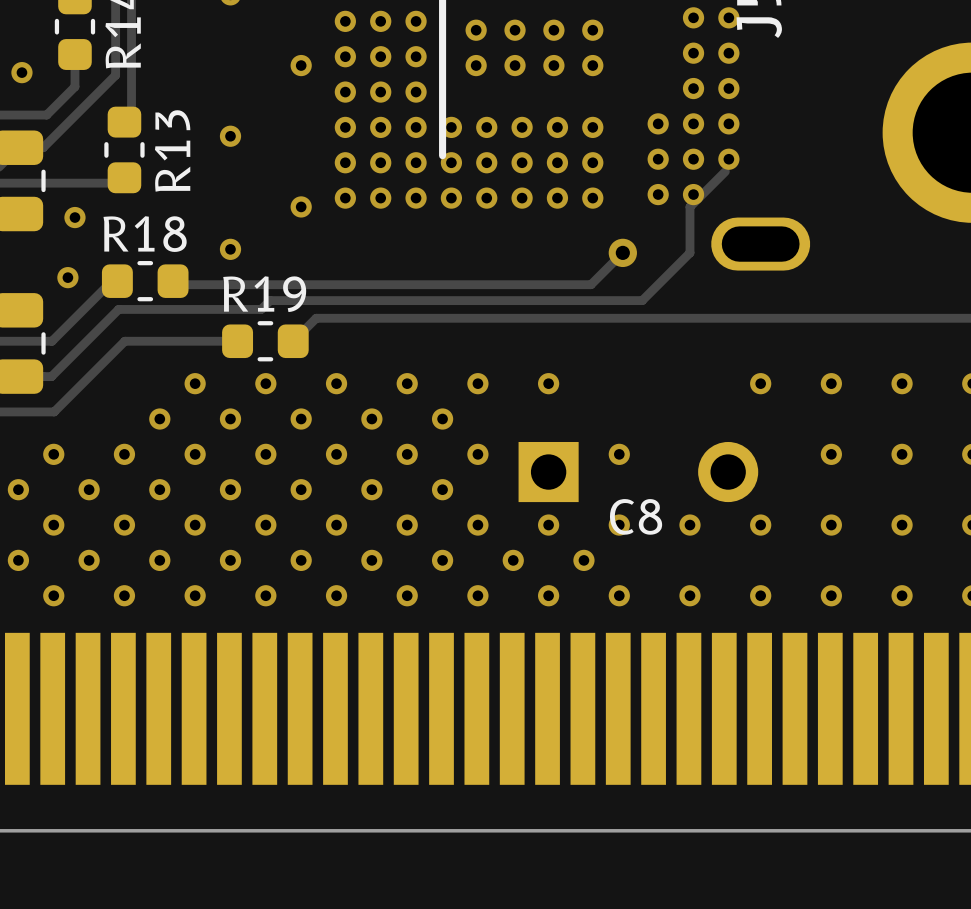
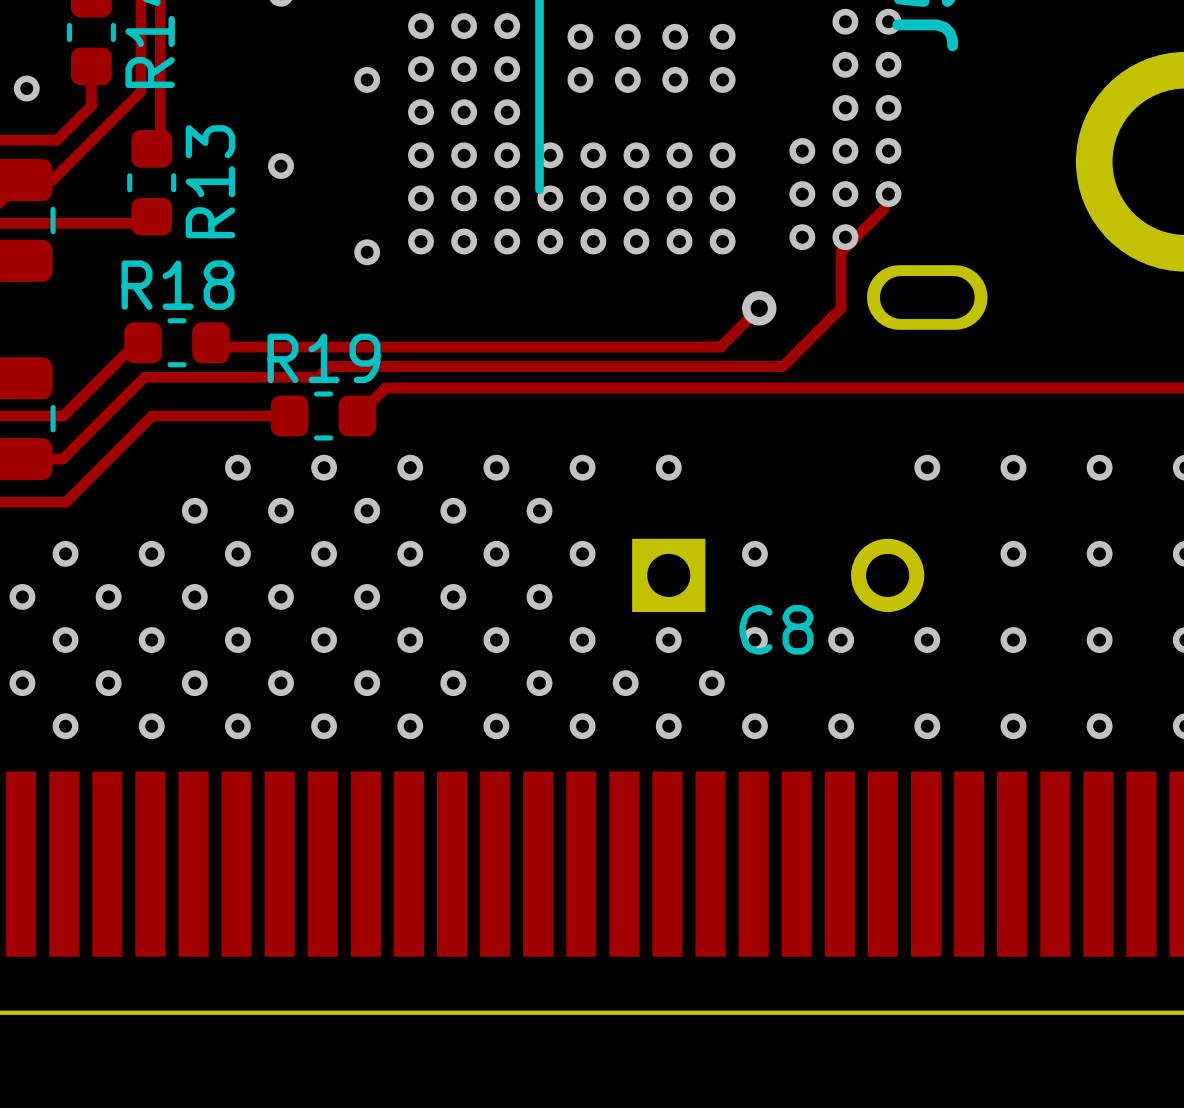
via: (74, 217) -> none
via: (230, 249) -> none
via: (67, 277) -> none

